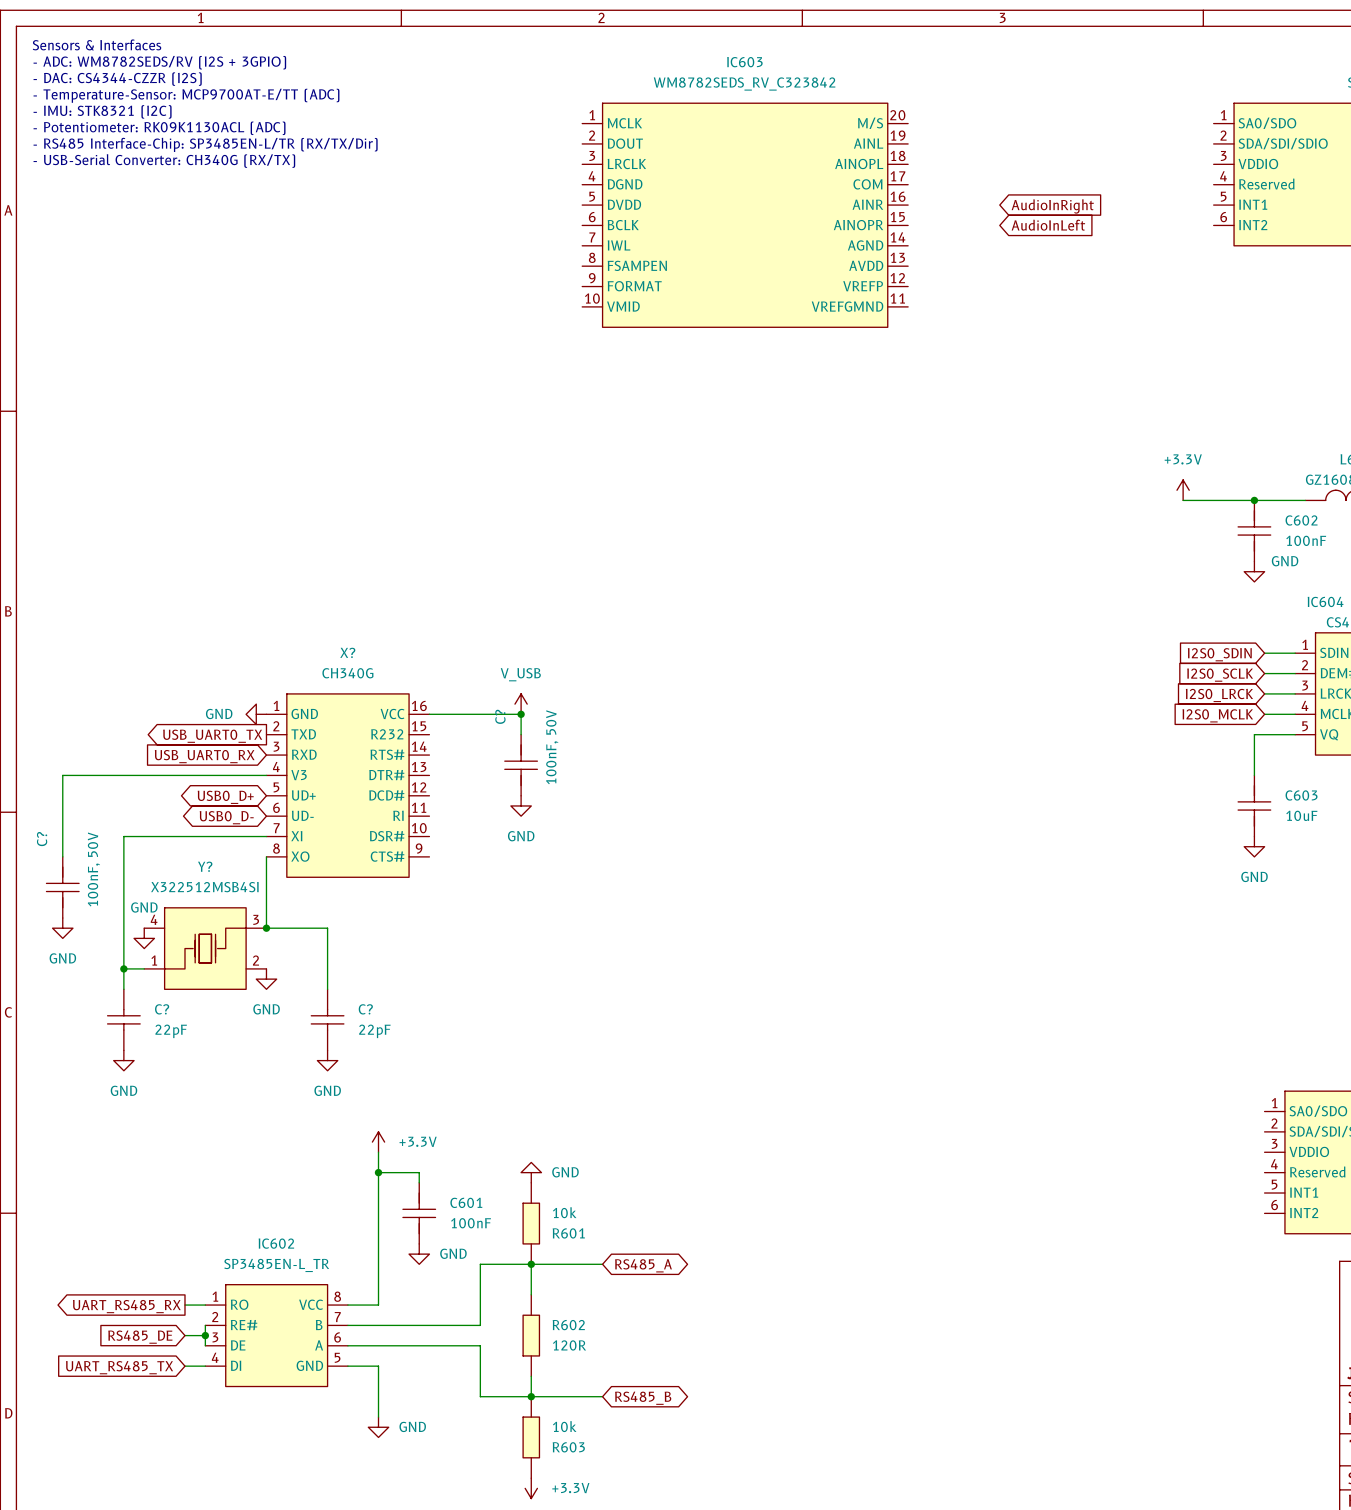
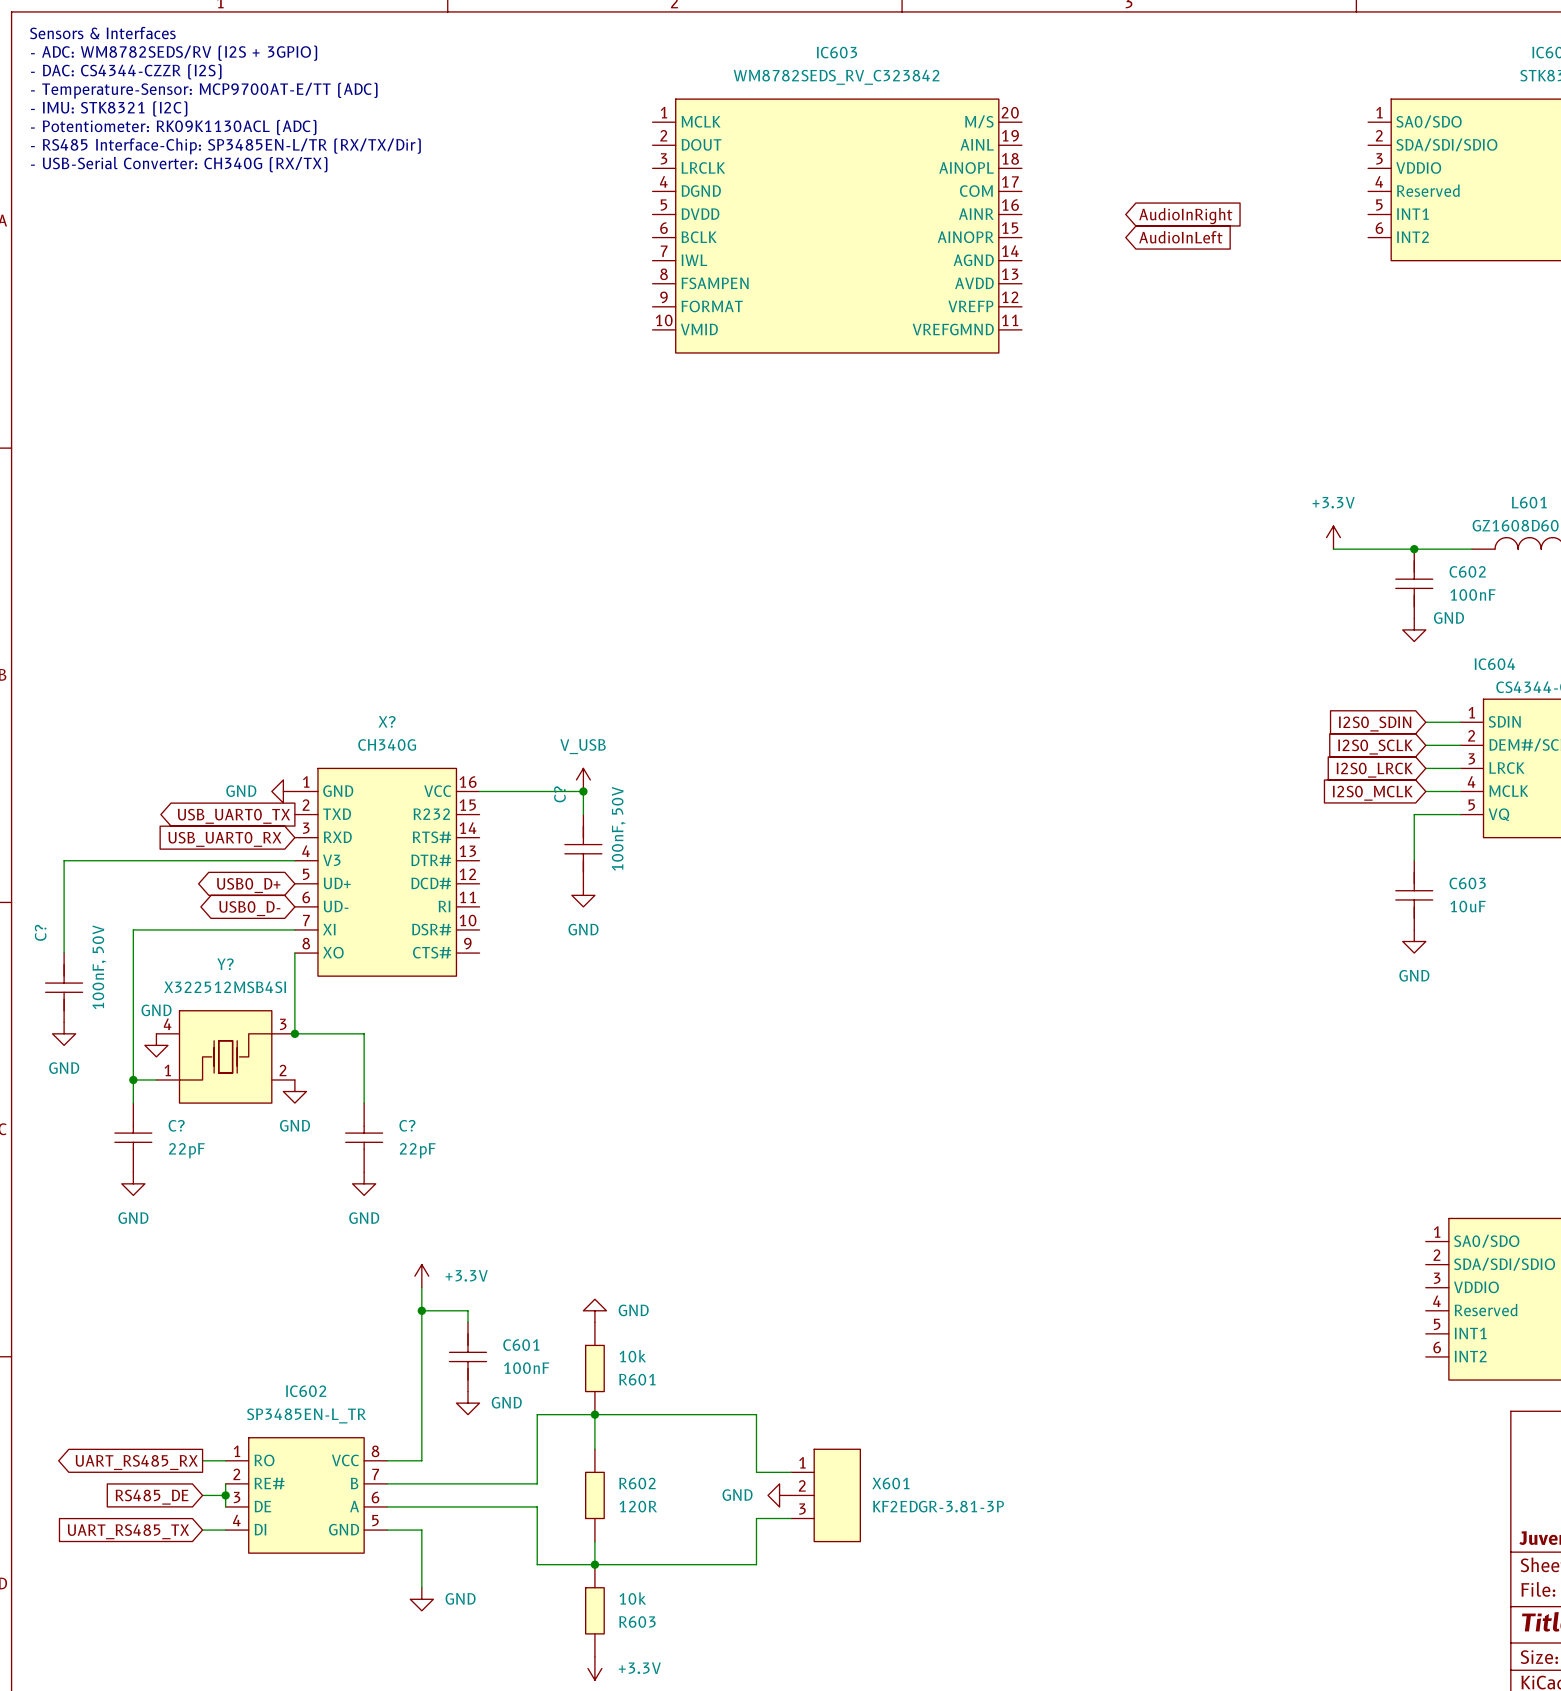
wire: none -> (675, 1414) (756, 1414) (756, 1472) (791, 1472)
global label: RS485_A (643, 1265) -> none
power symbol: none -> GND (779, 1495)
X601: none -> KF2EDGR-3.81-3P (825, 1495)
wire: none -> (791, 1518) (756, 1518) (756, 1564) (675, 1564)
global label: RS485_B (643, 1398) -> none

